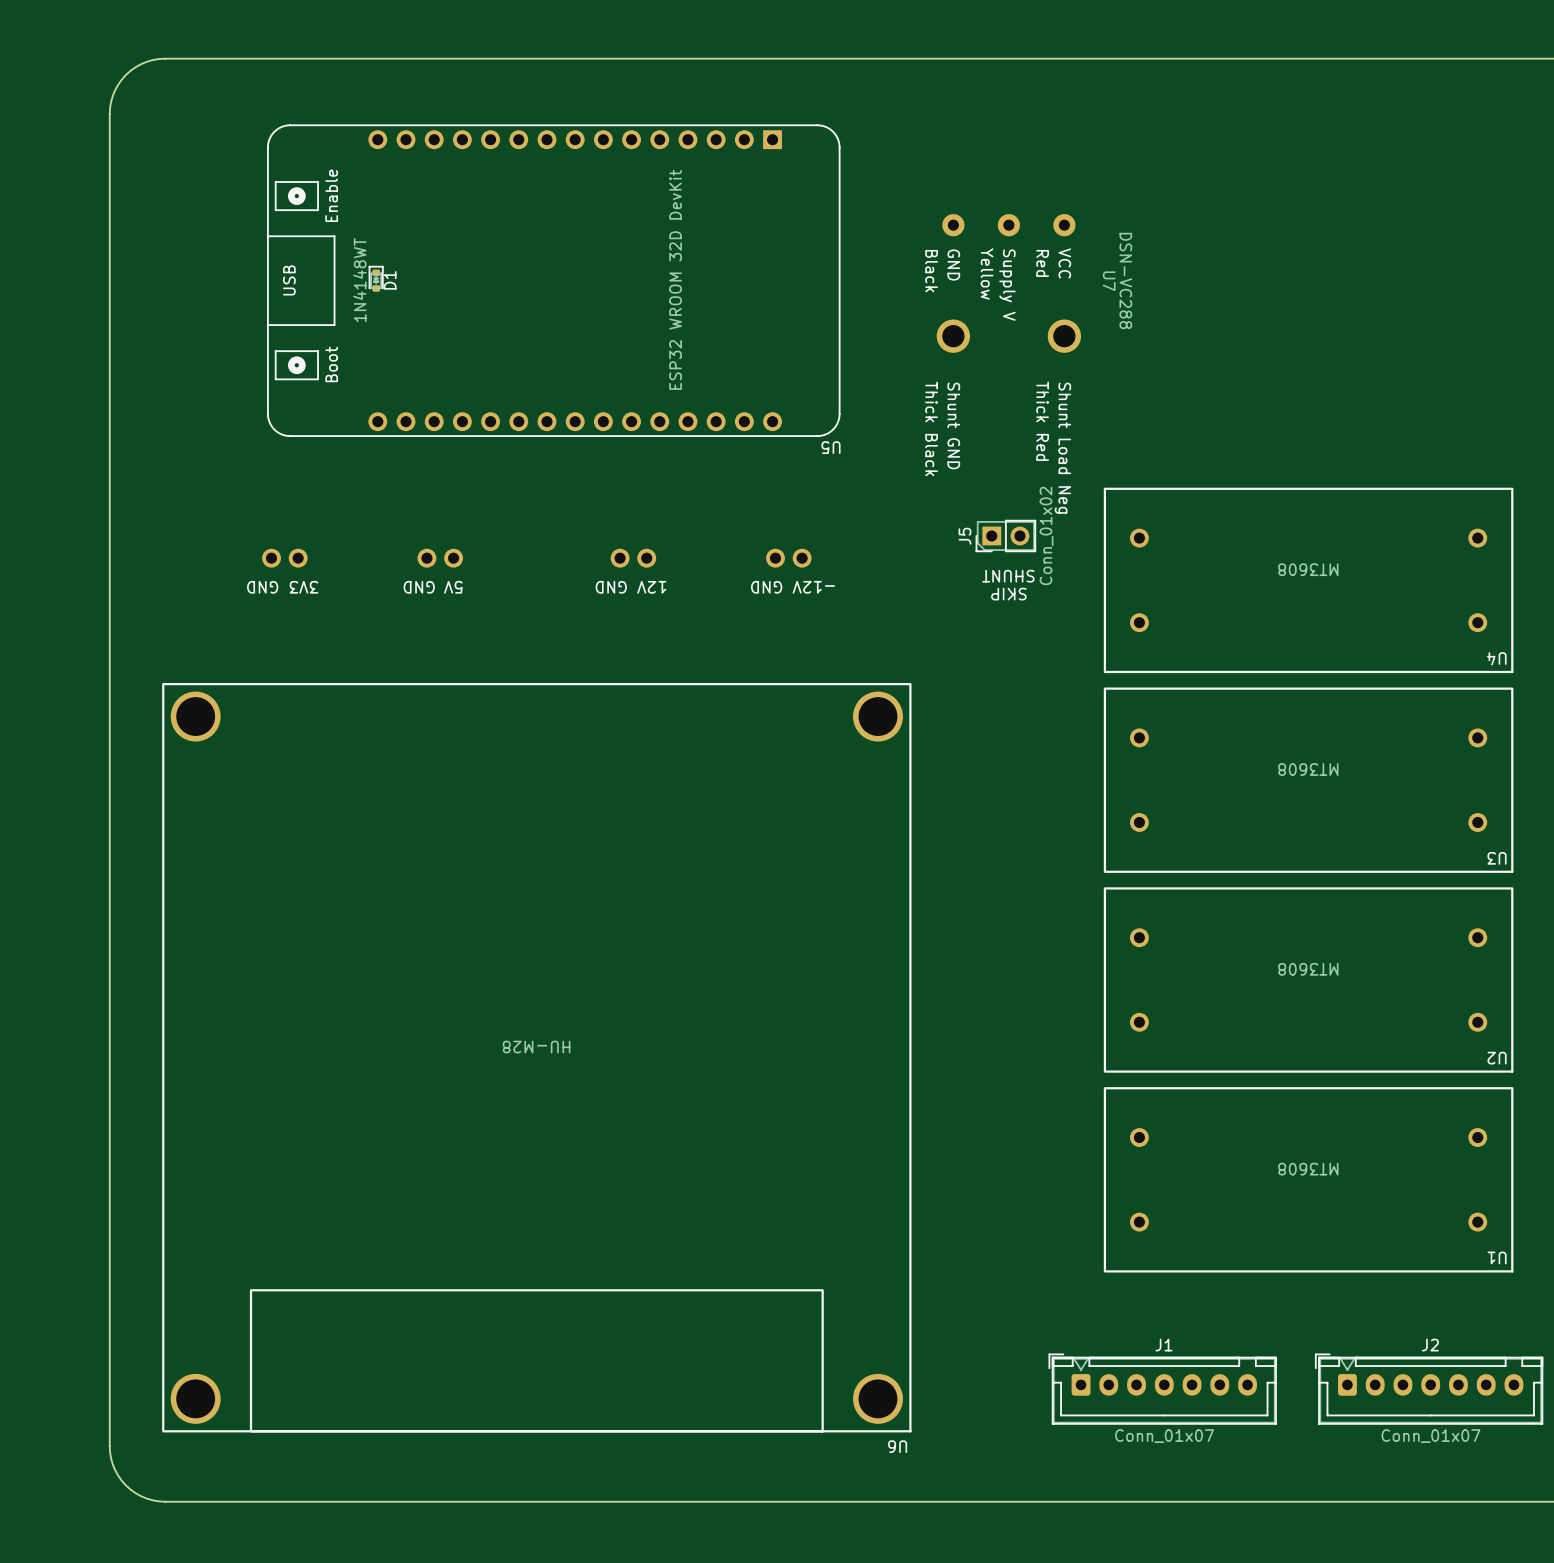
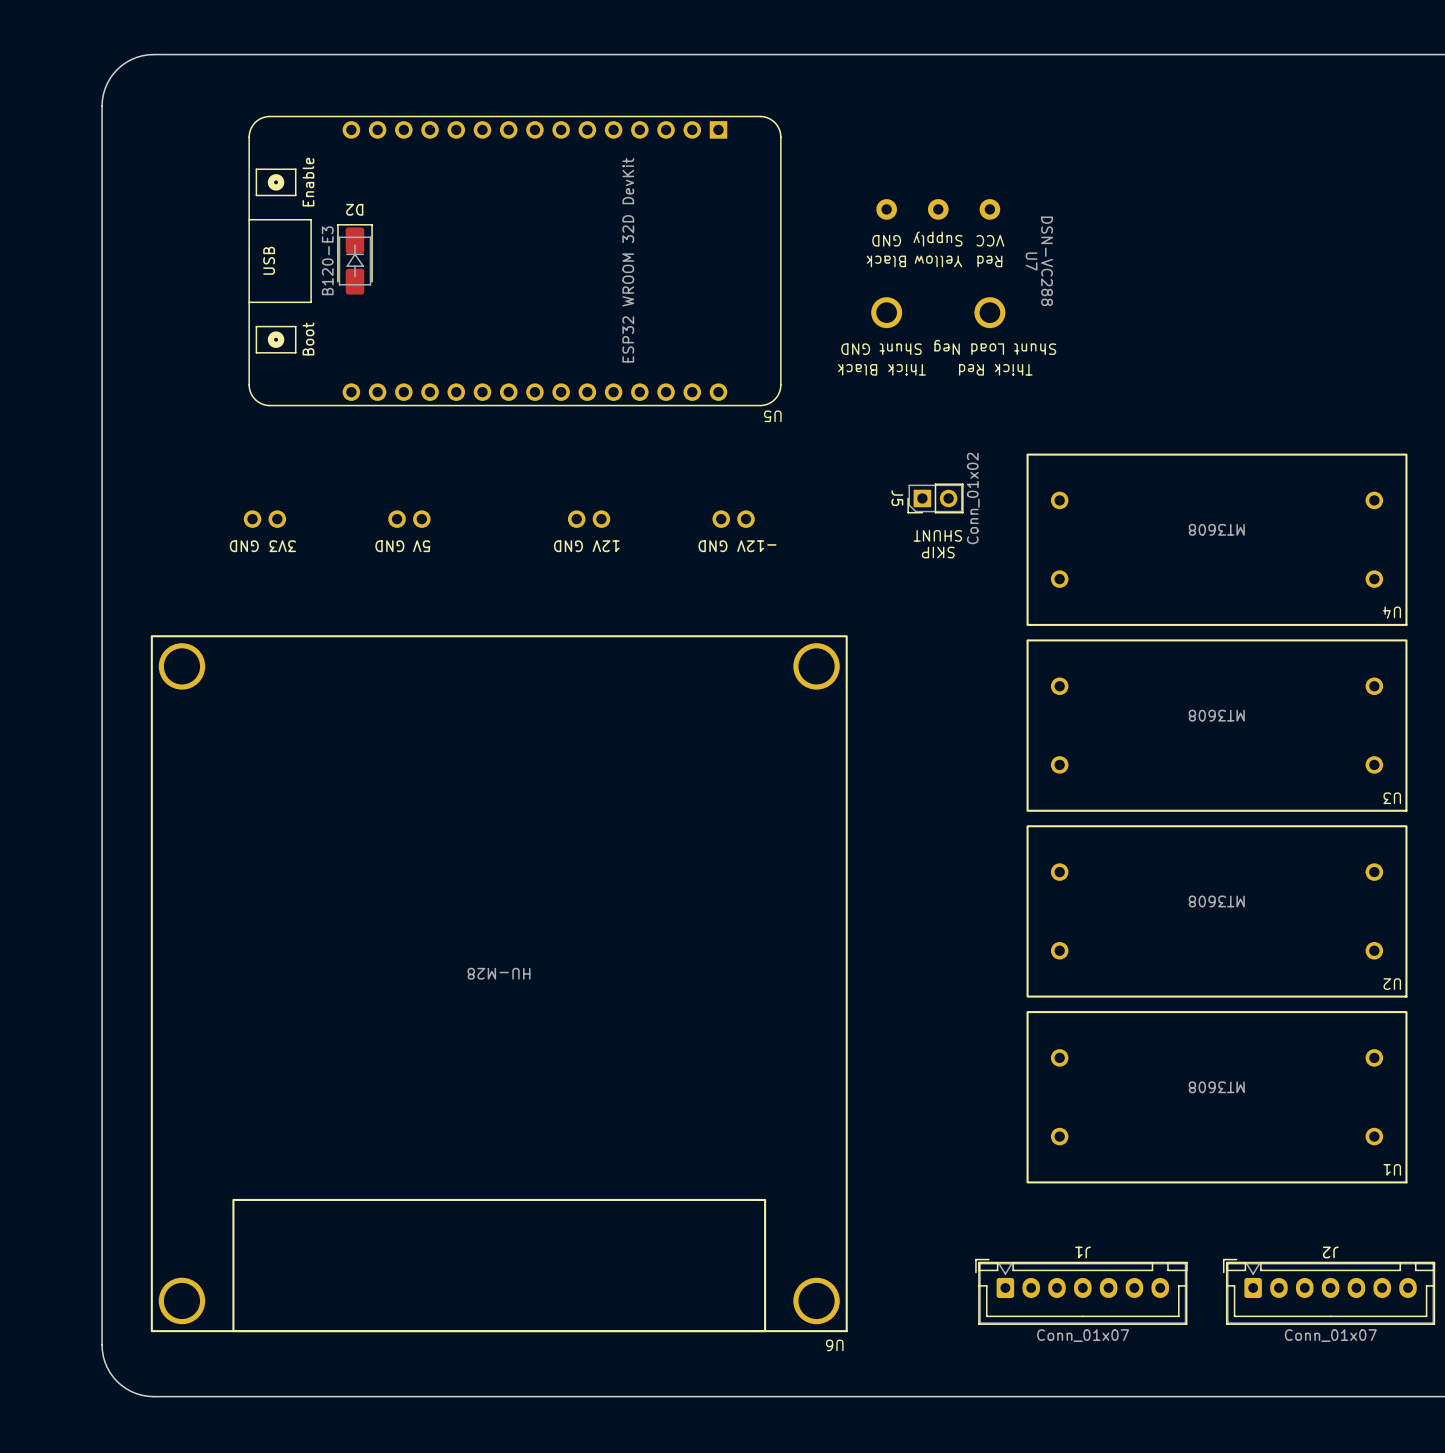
U7 footprint: [936, 214, 1082, 353] -> [871, 199, 1006, 329]
D1: 1N4148WT (376, 278) -> none
D2: none -> B120-E3 (354, 259)
J5 name rotation: 0° (964, 536) -> 180° (897, 498)
J1 name rotation: 0° (1164, 1345) -> 180° (1083, 1252)
J2 name rotation: 0° (1430, 1345) -> 180° (1330, 1252)

